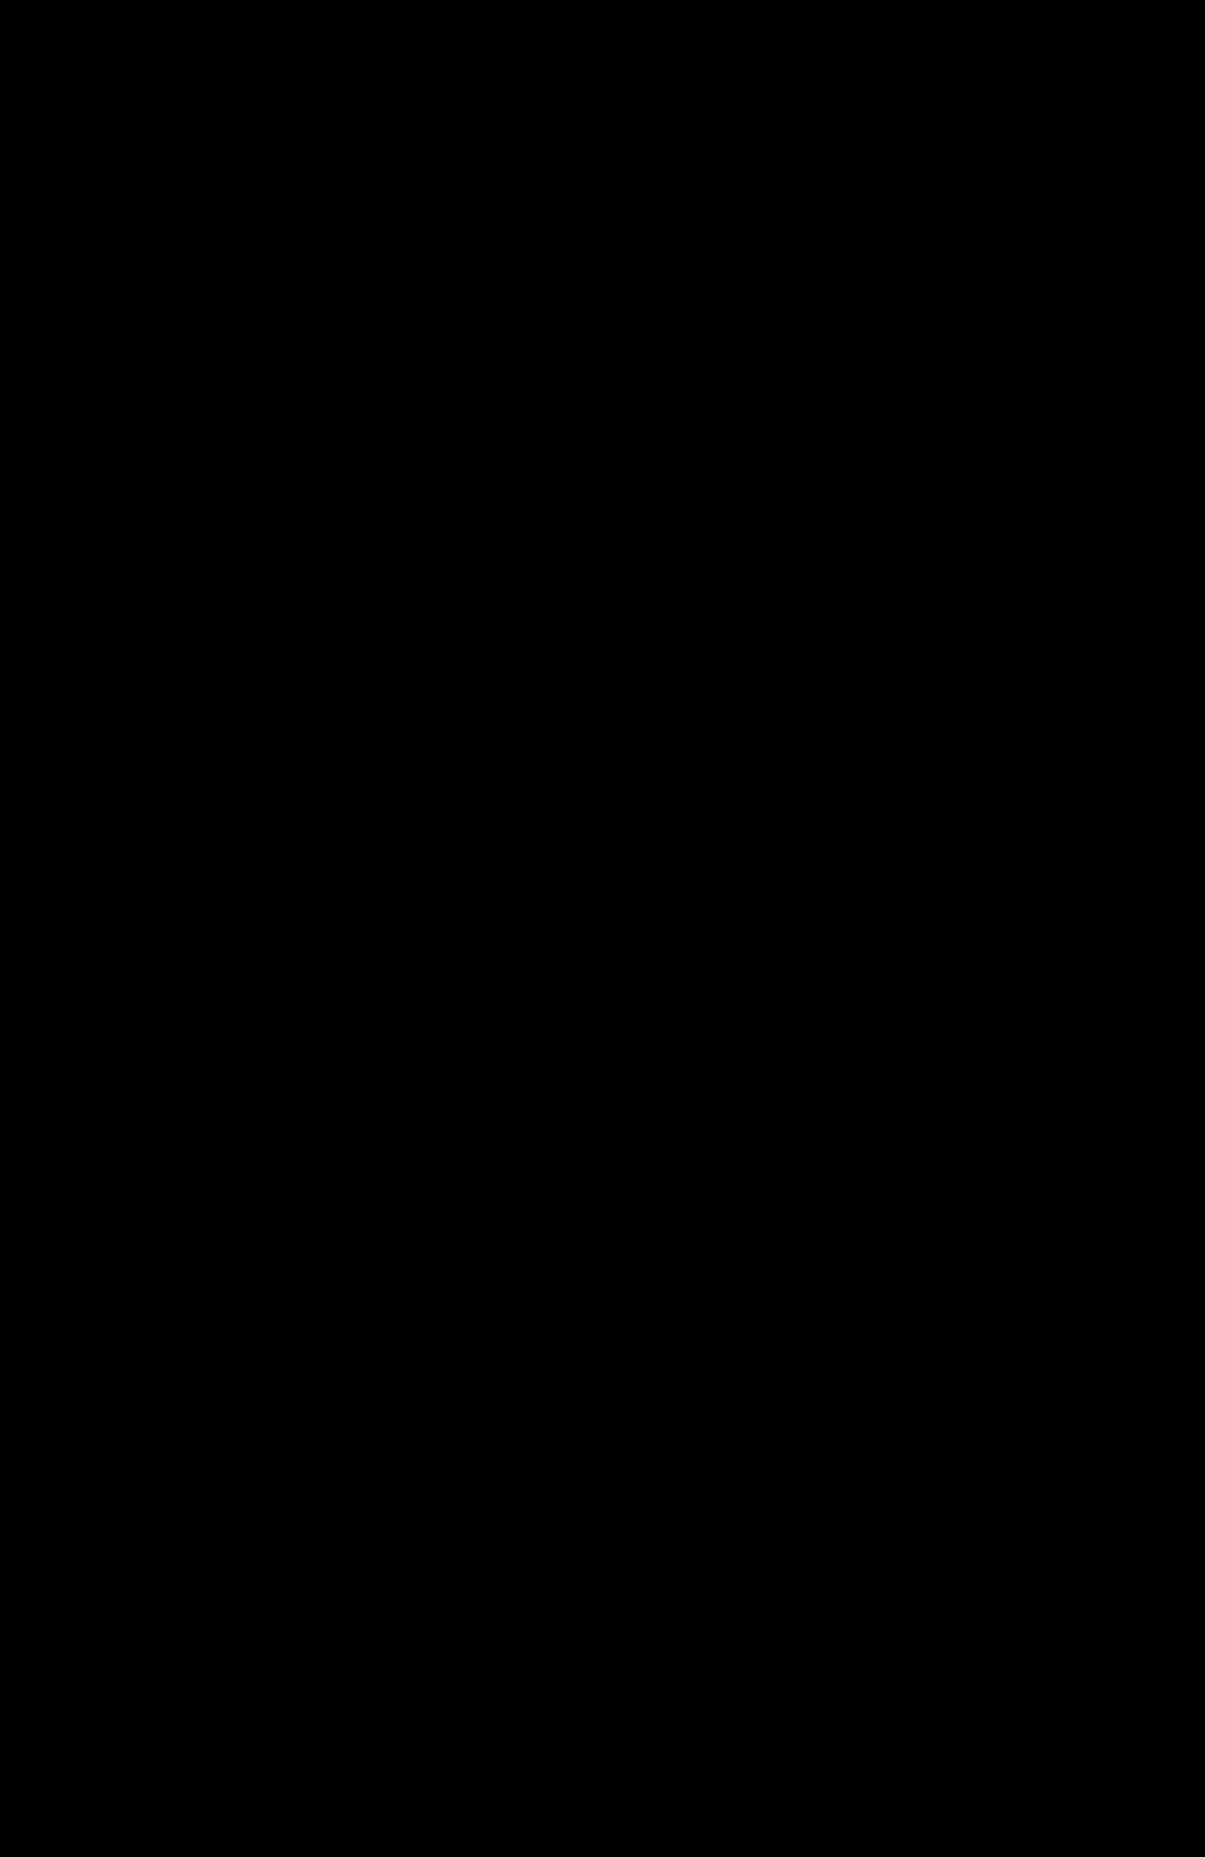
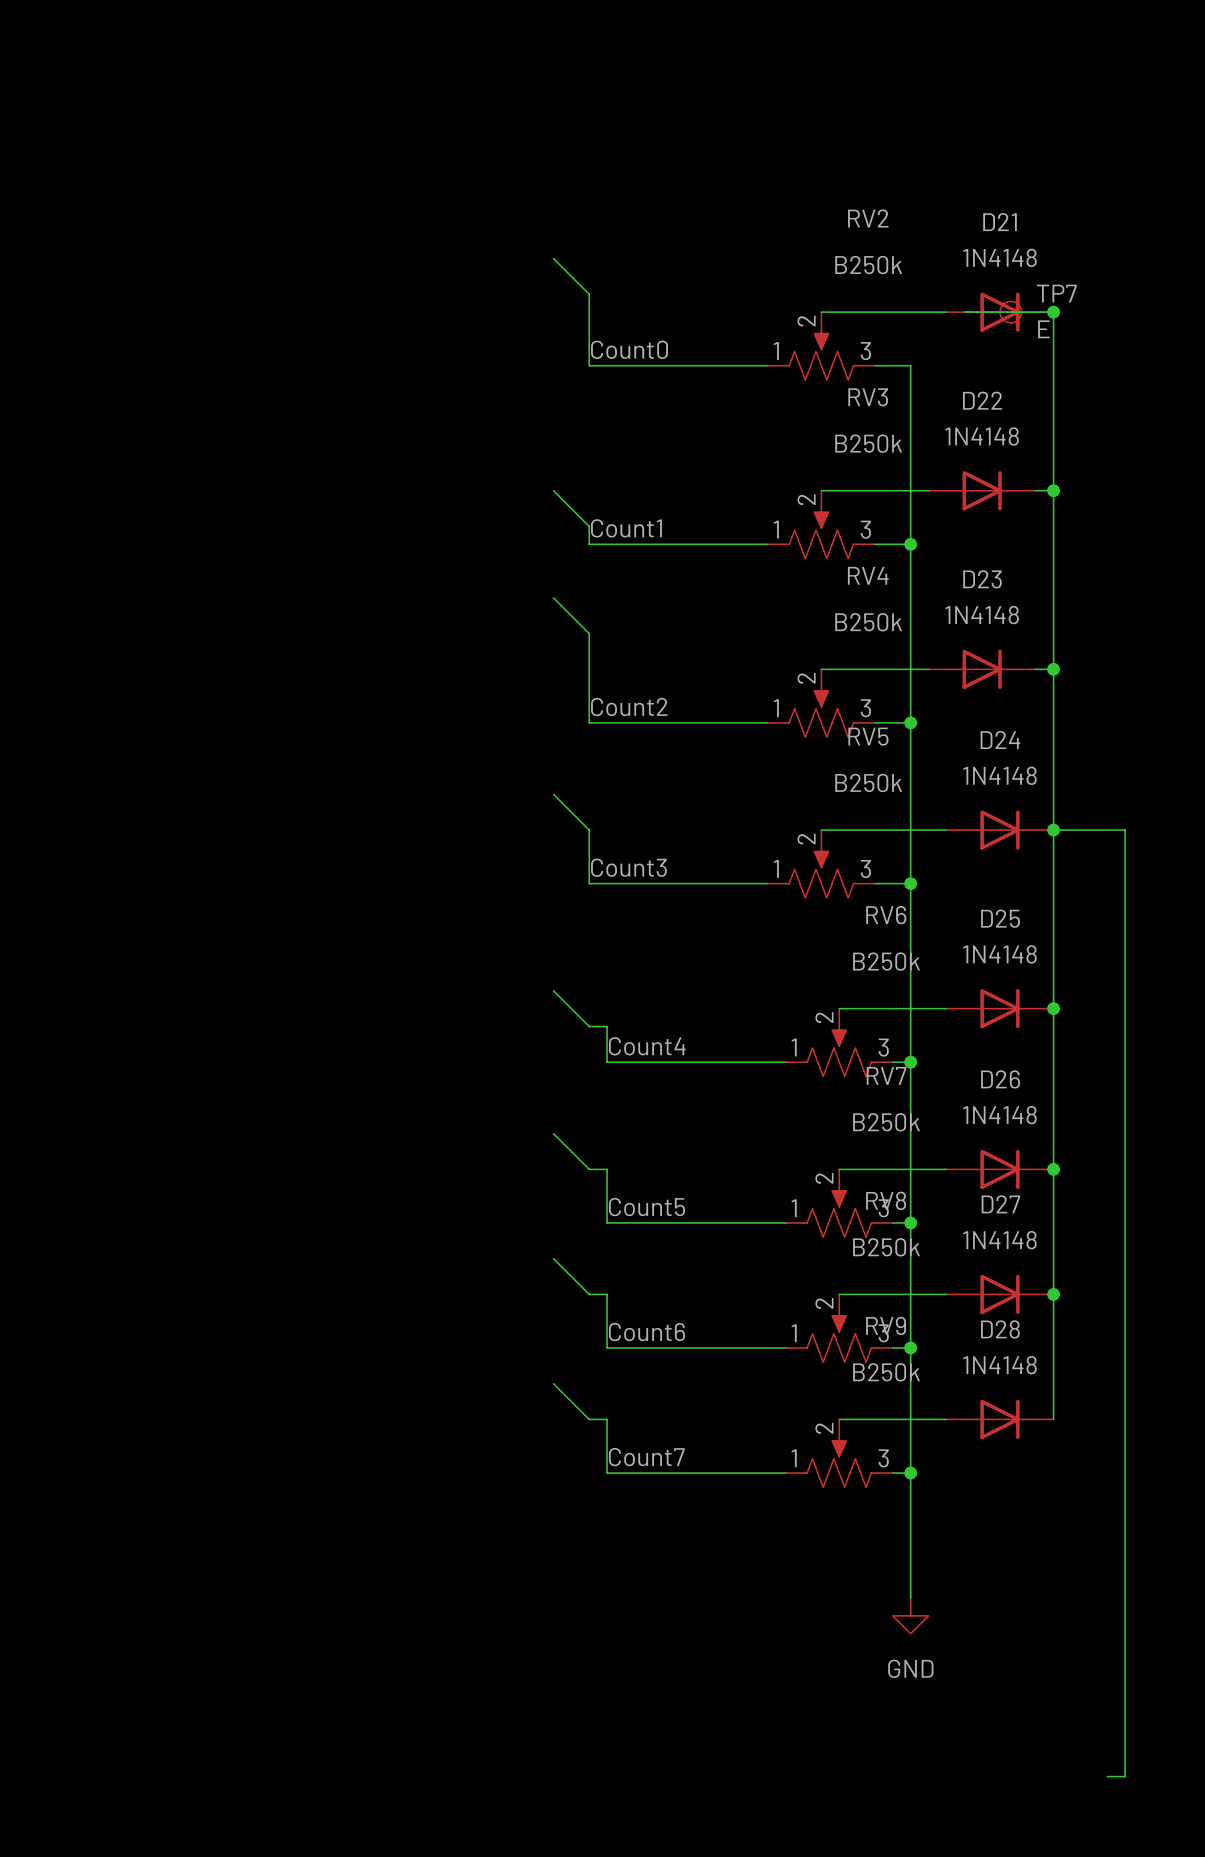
wire: none -> (553, 258) (589, 294) (589, 365) (767, 365)
wire: none -> (821, 312) (946, 312)
wire: none -> (964, 312) (1053, 312) (1053, 1419)
TP7: none -> E (992, 312)
D21: none -> 1N4148 (1000, 312)
junction: none -> (1053, 312)
RV2: none -> B250k (821, 346)
label: none -> Count0 (629, 349)
wire: none -> (874, 365) (910, 365) (910, 1598)
wire: none -> (553, 490) (589, 526) (589, 544) (767, 544)
wire: none -> (821, 490) (928, 490)
D22: none -> 1N4148 (982, 490)
wire: none -> (1035, 490) (1053, 490)
junction: none -> (1053, 490)
RV3: none -> B250k (821, 524)
label: none -> Count1 (626, 528)
wire: none -> (874, 544) (910, 544)
junction: none -> (910, 544)
wire: none -> (553, 597) (589, 633) (589, 722) (767, 722)
wire: none -> (821, 669) (928, 669)
D23: none -> 1N4148 (982, 669)
wire: none -> (1035, 669) (1053, 669)
junction: none -> (1053, 669)
RV4: none -> B250k (821, 703)
label: none -> Count2 (629, 706)
wire: none -> (874, 722) (910, 722)
junction: none -> (910, 722)
wire: none -> (553, 794) (589, 830) (589, 883) (767, 883)
wire: none -> (821, 830) (946, 830)
D24: none -> 1N4148 (1000, 830)
wire: none -> (1053, 830) (1125, 830) (1125, 1776) (1107, 1776)
junction: none -> (1053, 830)
RV5: none -> B250k (821, 864)
label: none -> Count3 (628, 867)
wire: none -> (874, 883) (910, 883)
junction: none -> (910, 883)
wire: none -> (553, 990) (589, 1026) (607, 1026) (607, 1062) (785, 1062)
wire: none -> (839, 1008) (946, 1008)
D25: none -> 1N4148 (1000, 1008)
junction: none -> (1053, 1008)
RV6: none -> B250k (839, 1042)
label: none -> Count4 (647, 1046)
wire: none -> (892, 1062) (910, 1062)
junction: none -> (910, 1062)
wire: none -> (553, 1133) (589, 1169) (607, 1169) (607, 1222) (785, 1222)
wire: none -> (839, 1169) (946, 1169)
D26: none -> 1N4148 (1000, 1169)
junction: none -> (1053, 1169)
RV7: none -> B250k (839, 1203)
label: none -> Count5 (646, 1207)
wire: none -> (892, 1222) (910, 1222)
junction: none -> (910, 1222)
wire: none -> (553, 1258) (589, 1294) (607, 1294) (607, 1347) (785, 1347)
wire: none -> (839, 1294) (946, 1294)
D27: none -> 1N4148 (1000, 1294)
junction: none -> (1053, 1294)
RV8: none -> B250k (839, 1328)
label: none -> Count6 (646, 1332)
wire: none -> (892, 1347) (910, 1347)
junction: none -> (910, 1347)
wire: none -> (553, 1383) (589, 1419) (607, 1419) (607, 1473) (785, 1473)
wire: none -> (839, 1419) (946, 1419)
D28: none -> 1N4148 (1000, 1419)
RV9: none -> B250k (839, 1453)
label: none -> Count7 (646, 1457)
wire: none -> (892, 1473) (910, 1473)
junction: none -> (910, 1473)
power symbol: none -> GND (910, 1615)

